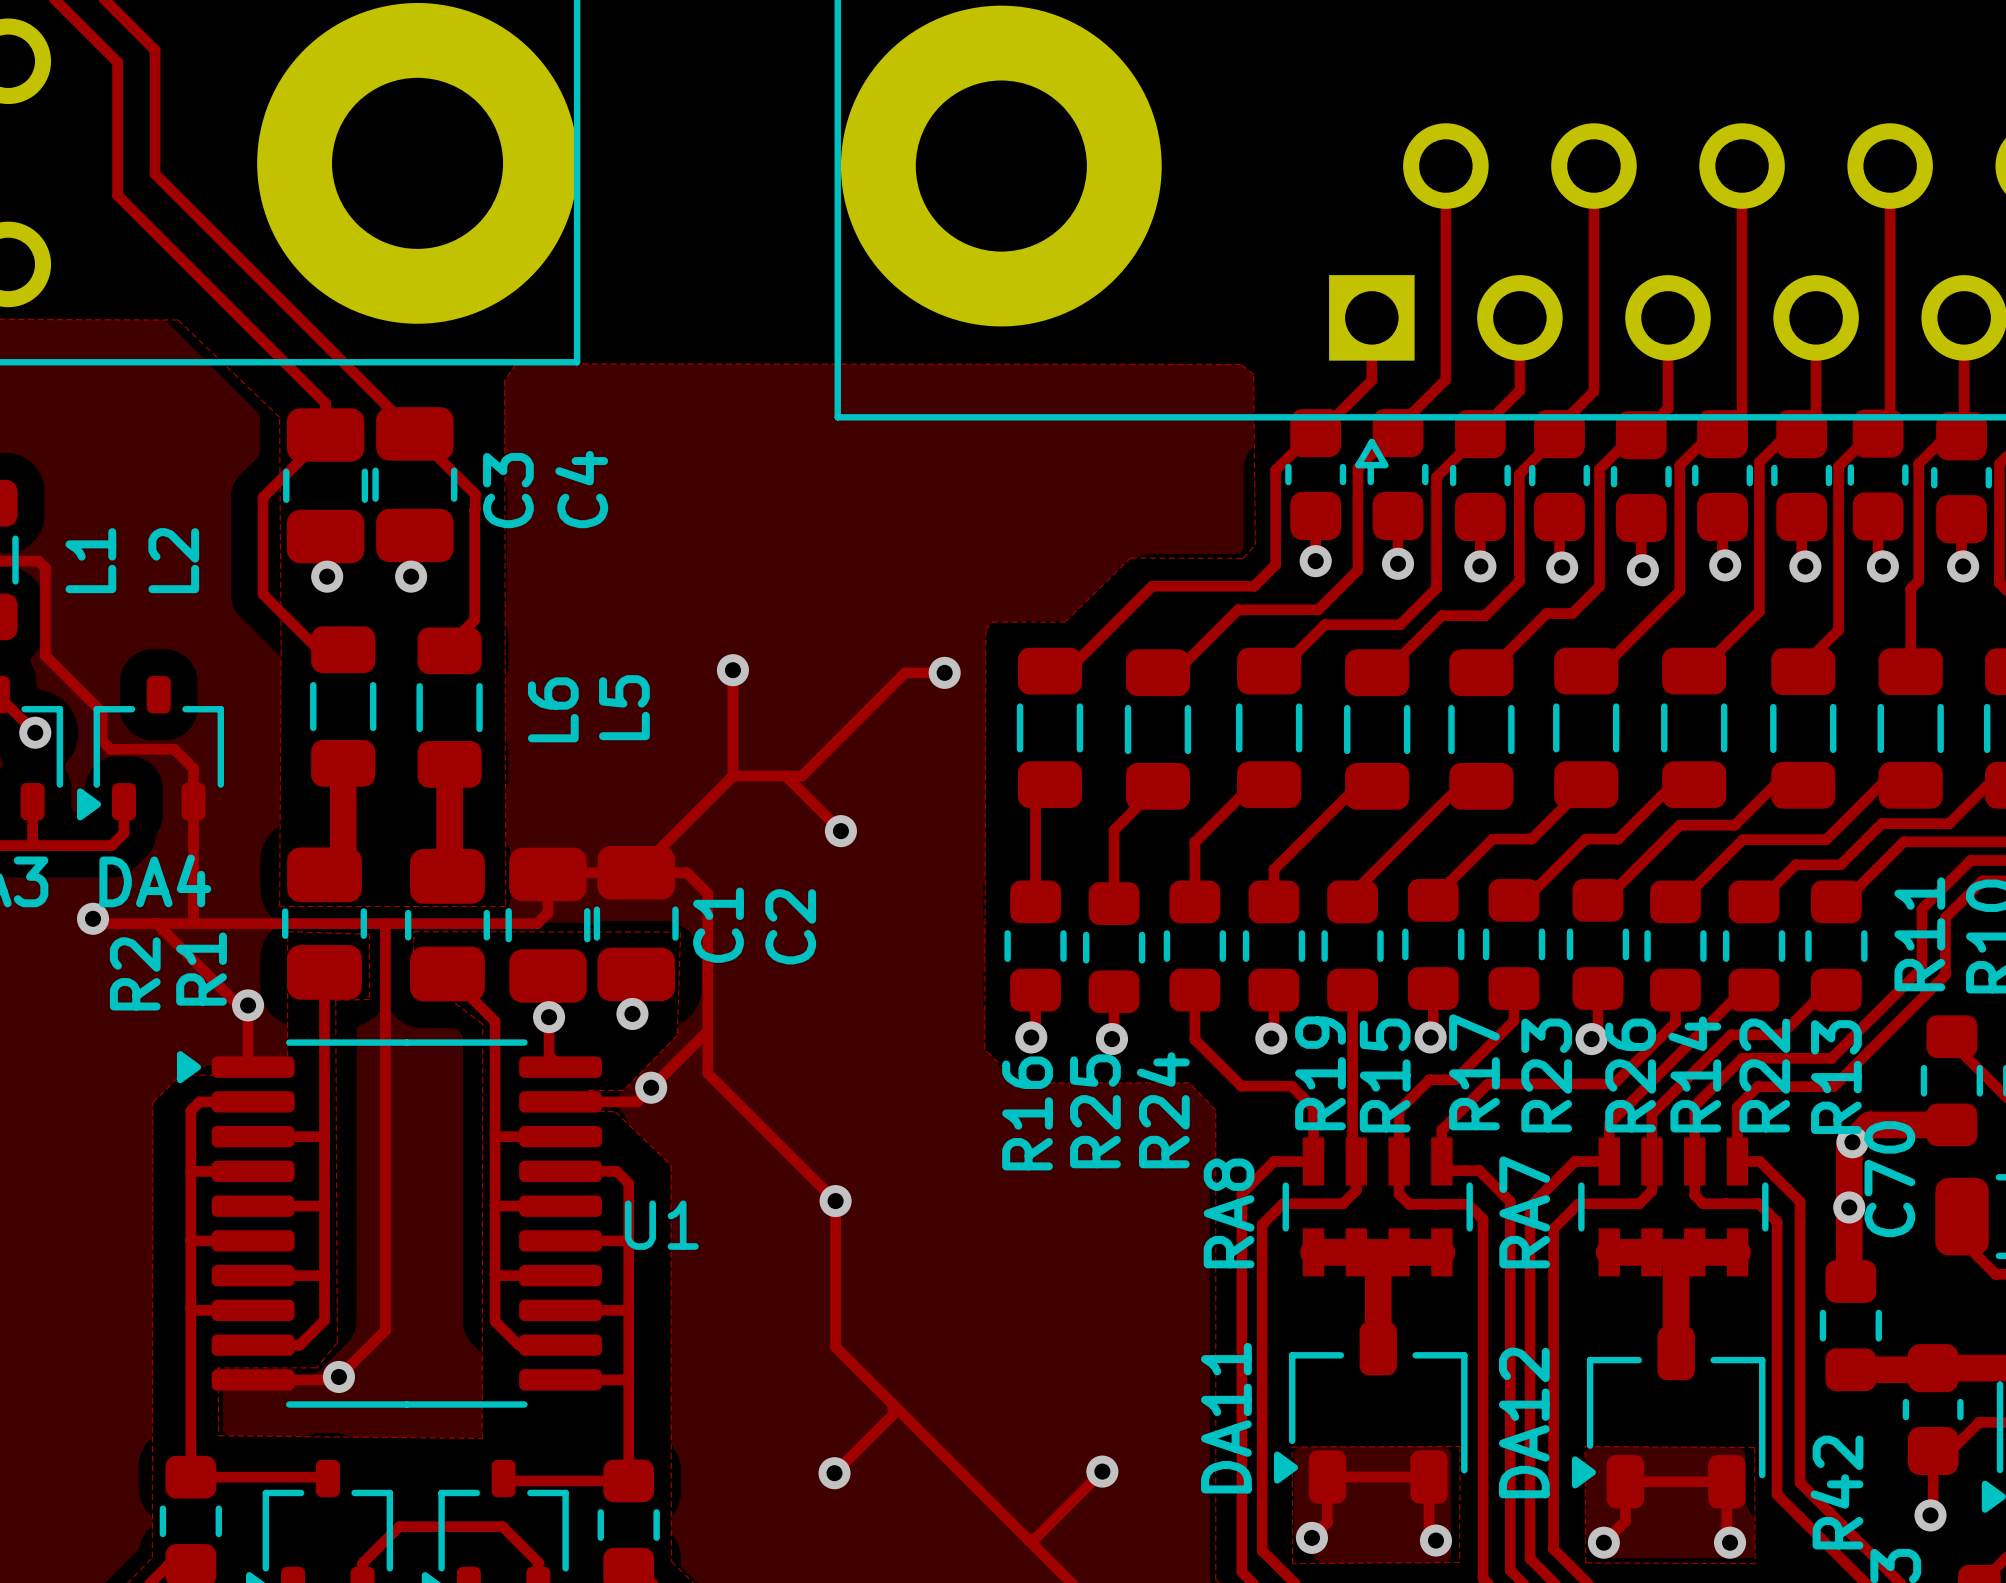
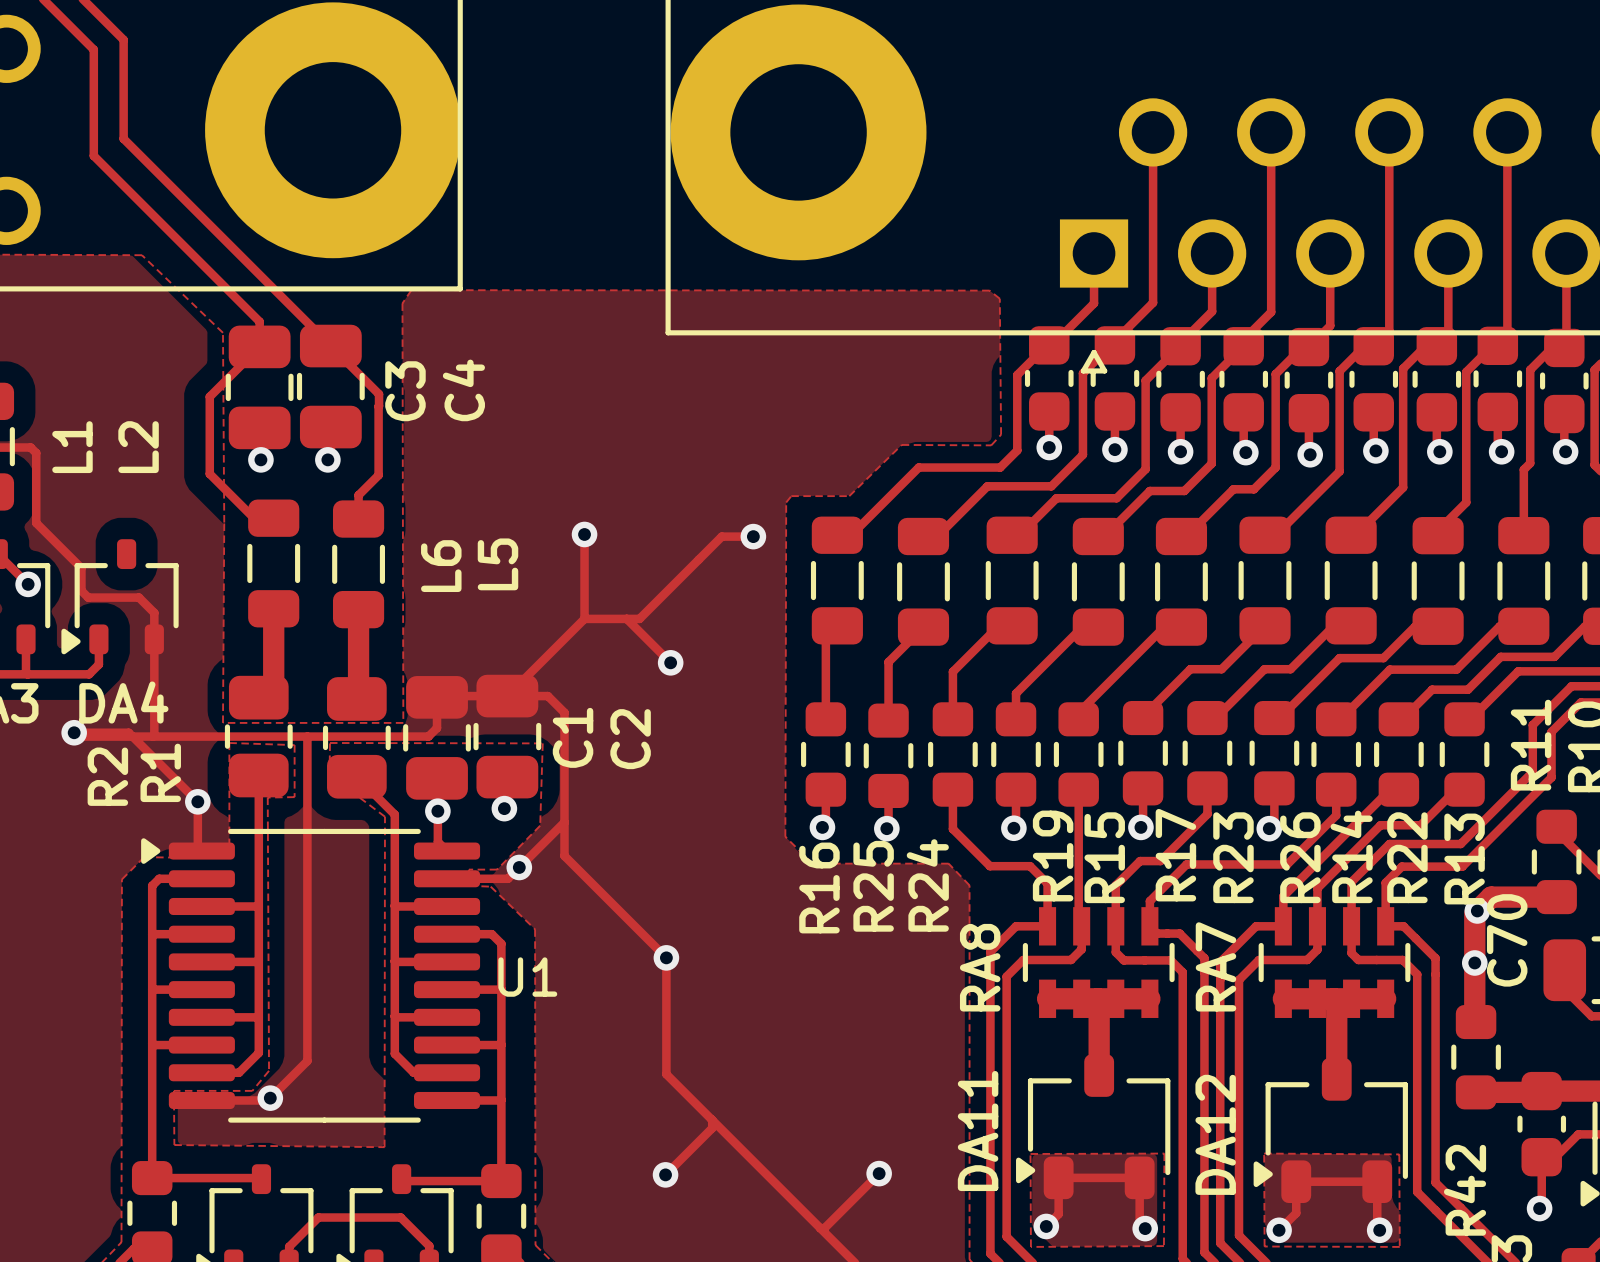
track: (474, 595) (474, 619) (449, 645) -> (378, 475) (358, 495) (358, 514)
track: (156, 923) (238, 1005) (248, 1005) -> (74, 732) (128, 732) (197, 801)

